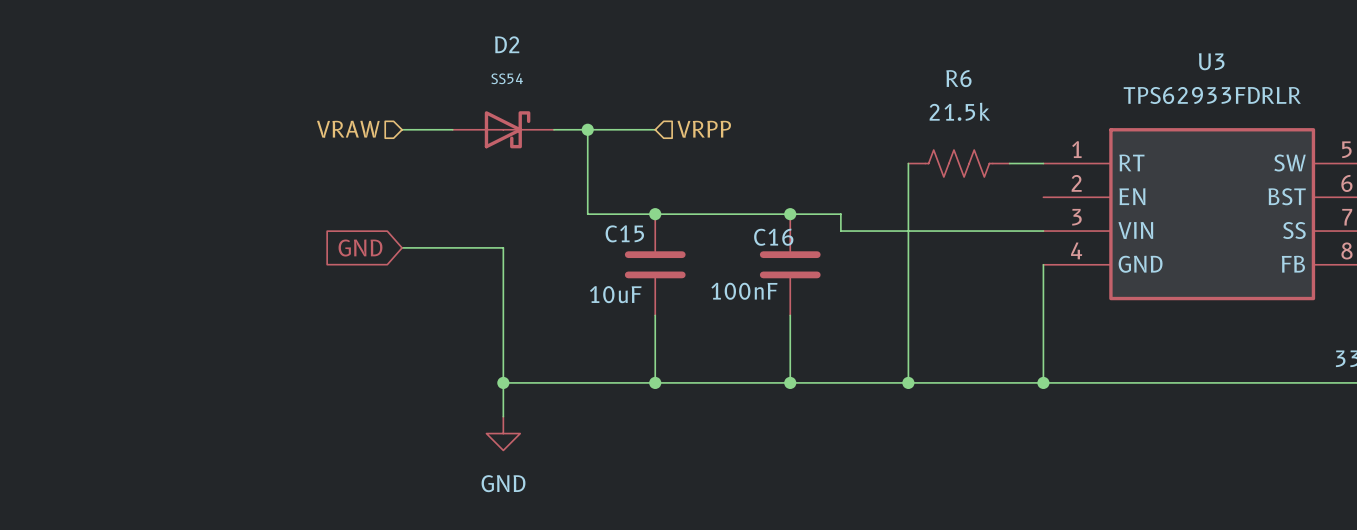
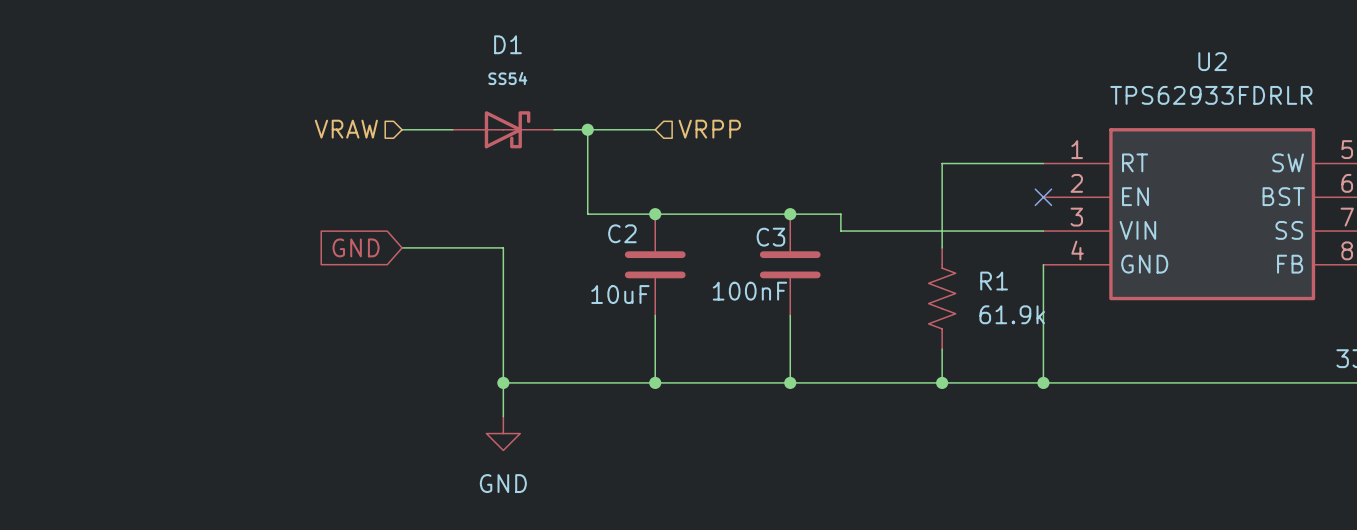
D2 name: D2 (507, 44) -> D1 (507, 44)
U3 name: U3 (1211, 61) -> U2 (1212, 61)
wire: (908, 163) (908, 382) -> none
R6: 21.5k (959, 163) -> none
wire: none -> (1009, 163) (942, 163) (942, 247)
no-connect mark: none -> (1043, 197)
C15 name: C15 (624, 233) -> C2 (622, 233)
C16 name: C16 (773, 237) -> C3 (770, 237)
R1: none -> 61.9k (942, 298)
wire: none -> (942, 349) (942, 382)
junction position: (908, 382) -> (942, 382)

